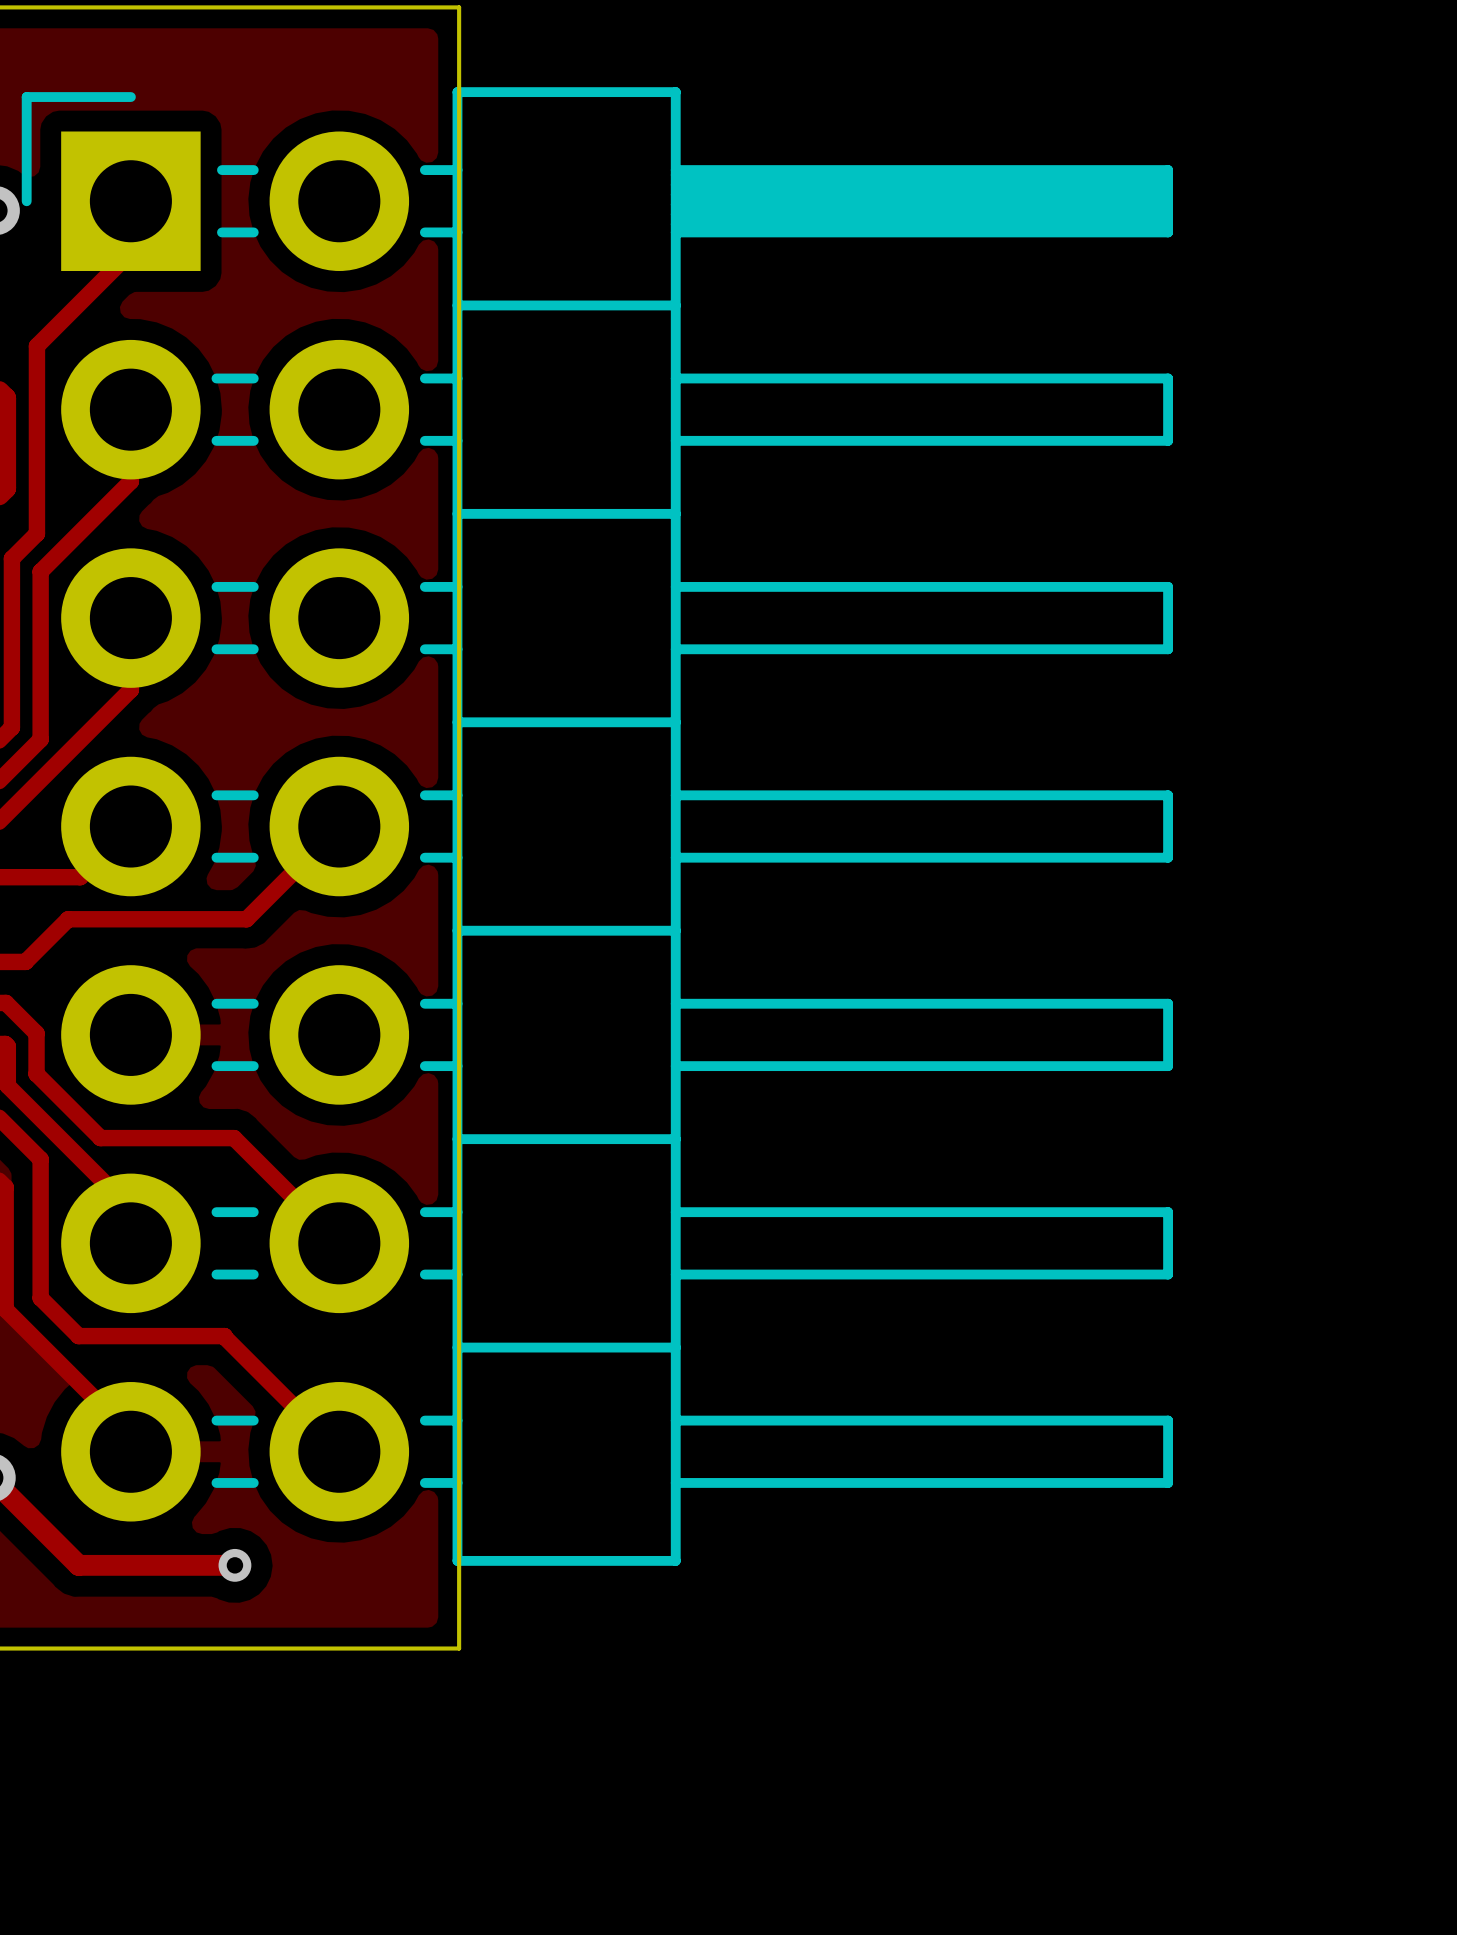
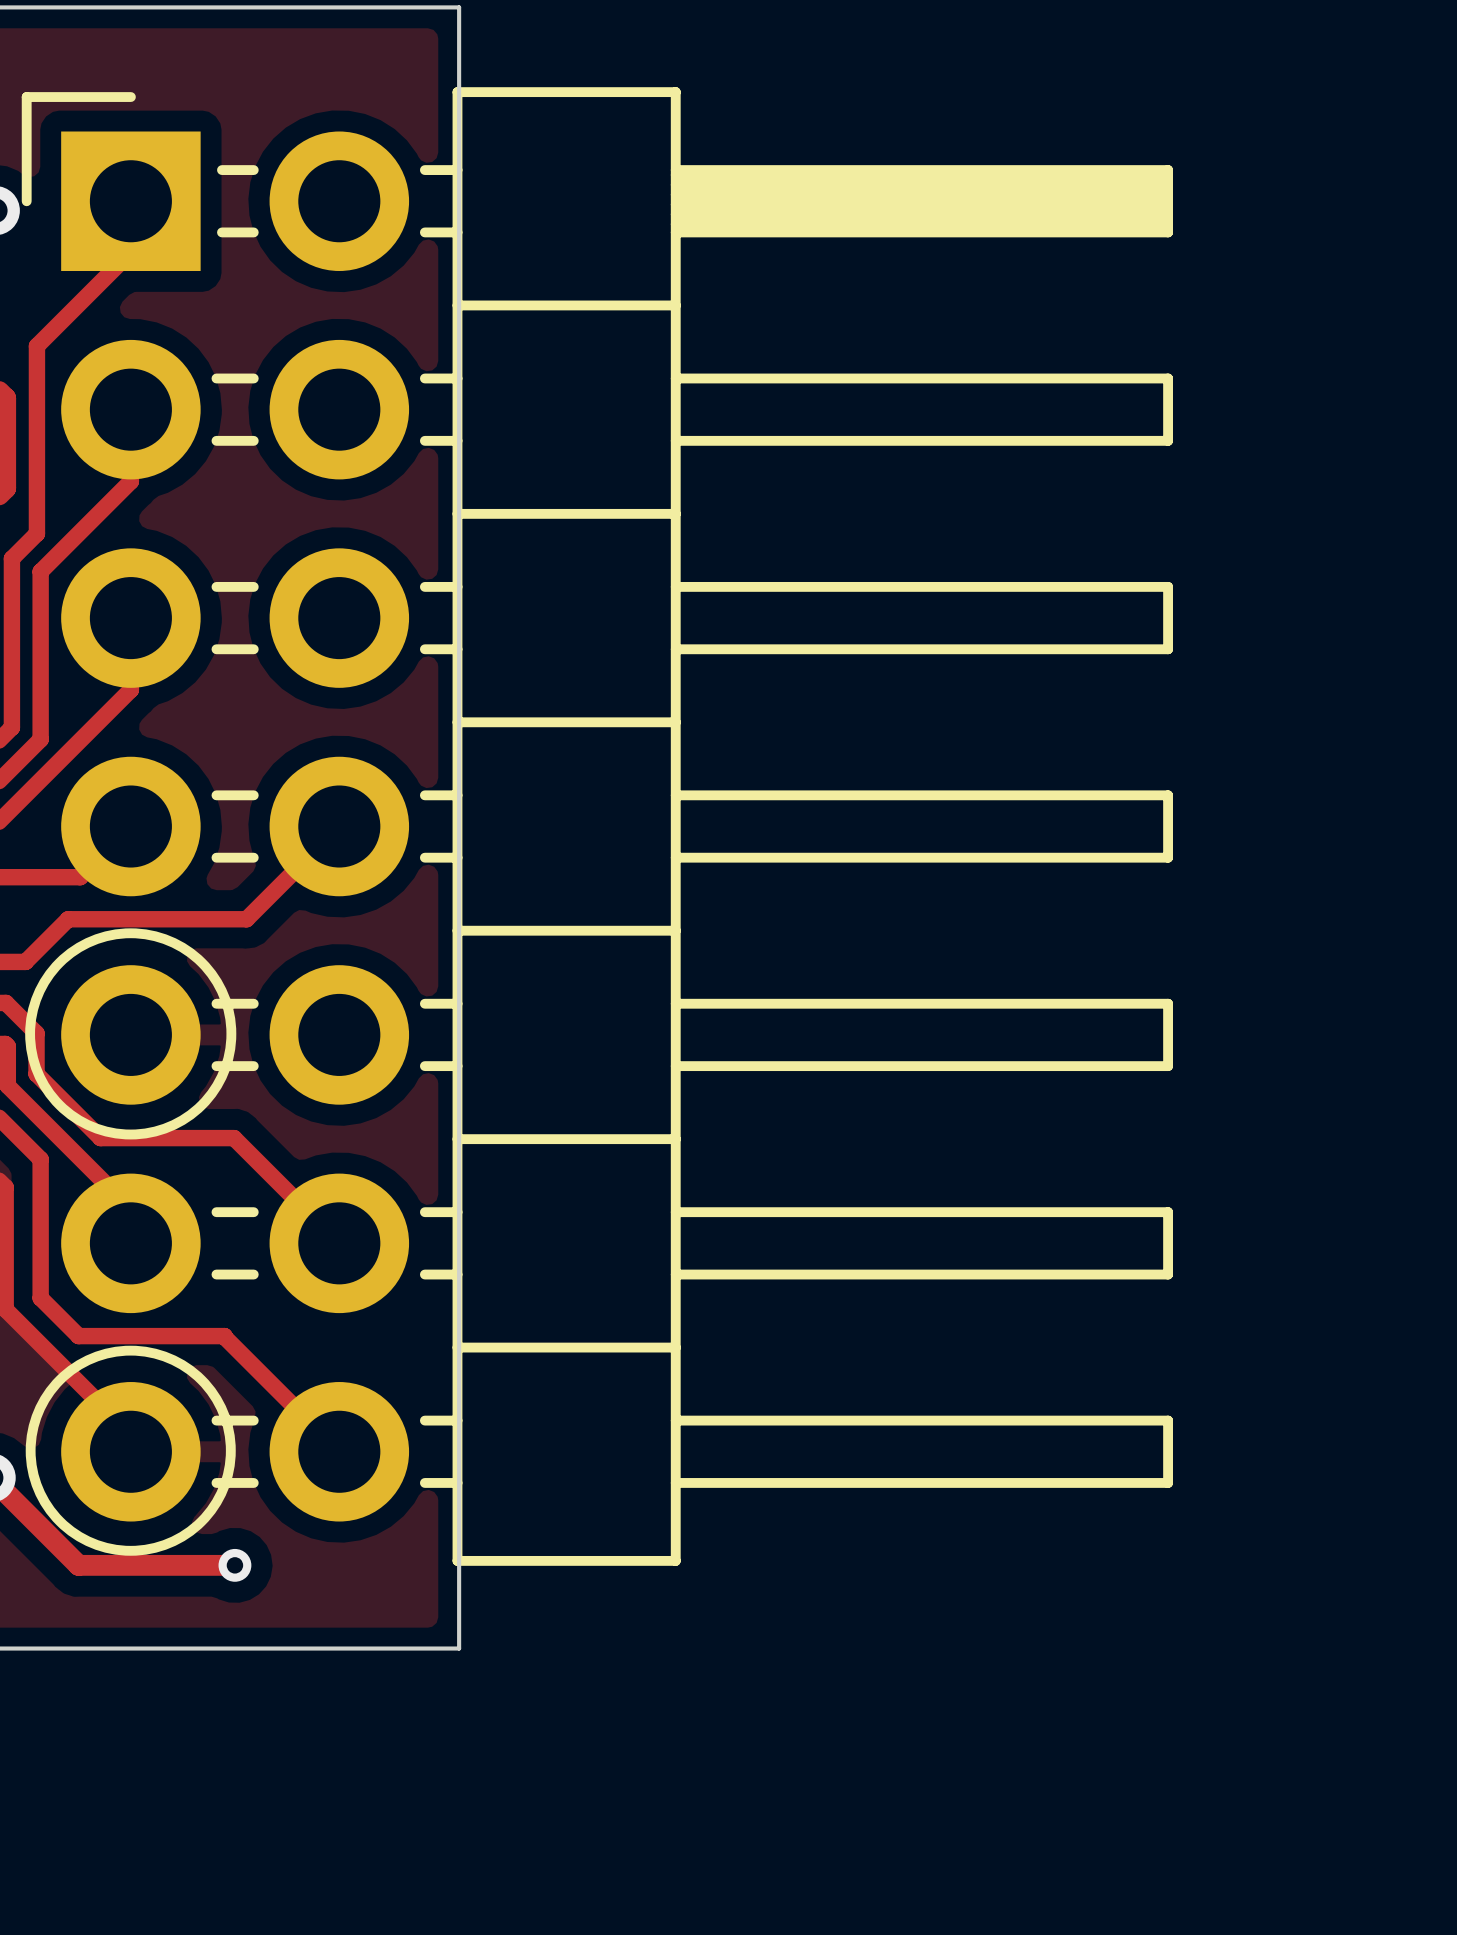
drawing: none -> [25, 928, 237, 1140]
drawing: none -> [25, 1345, 236, 1556]

